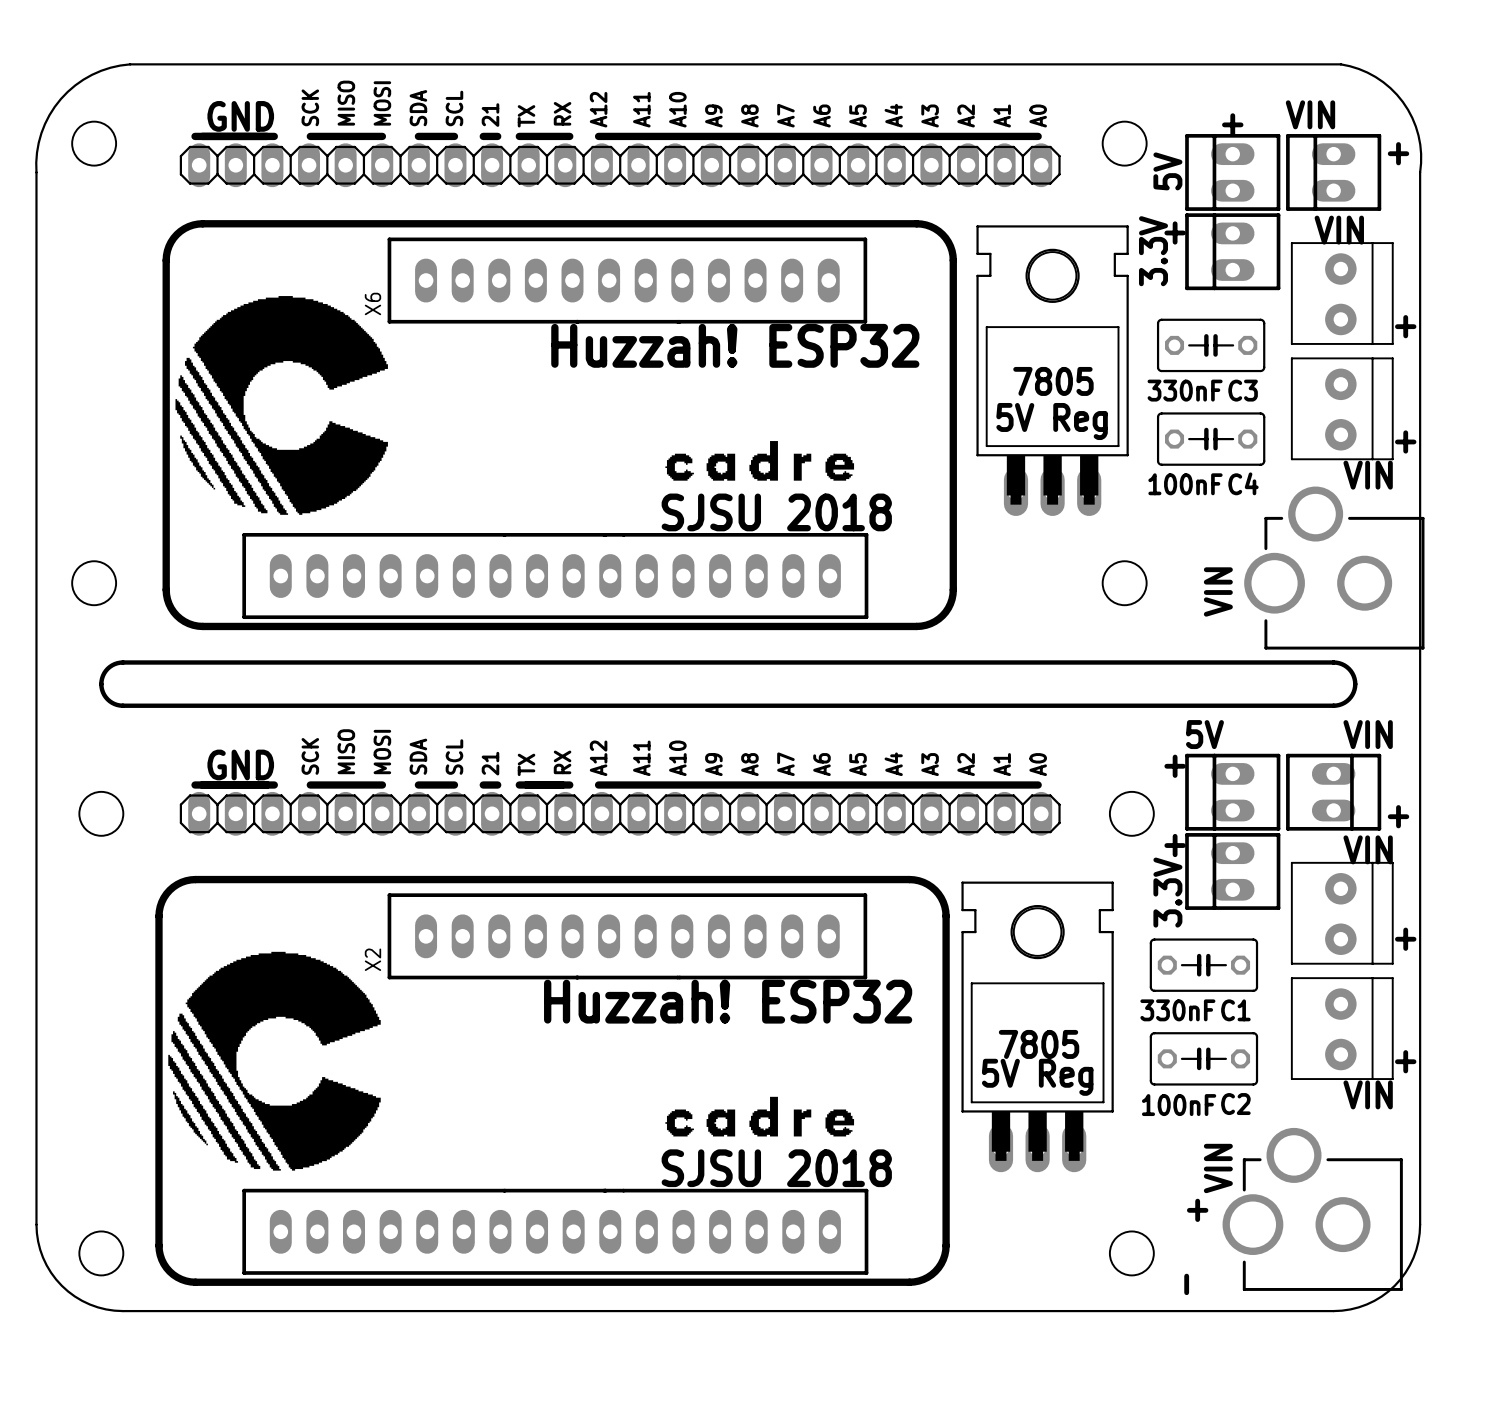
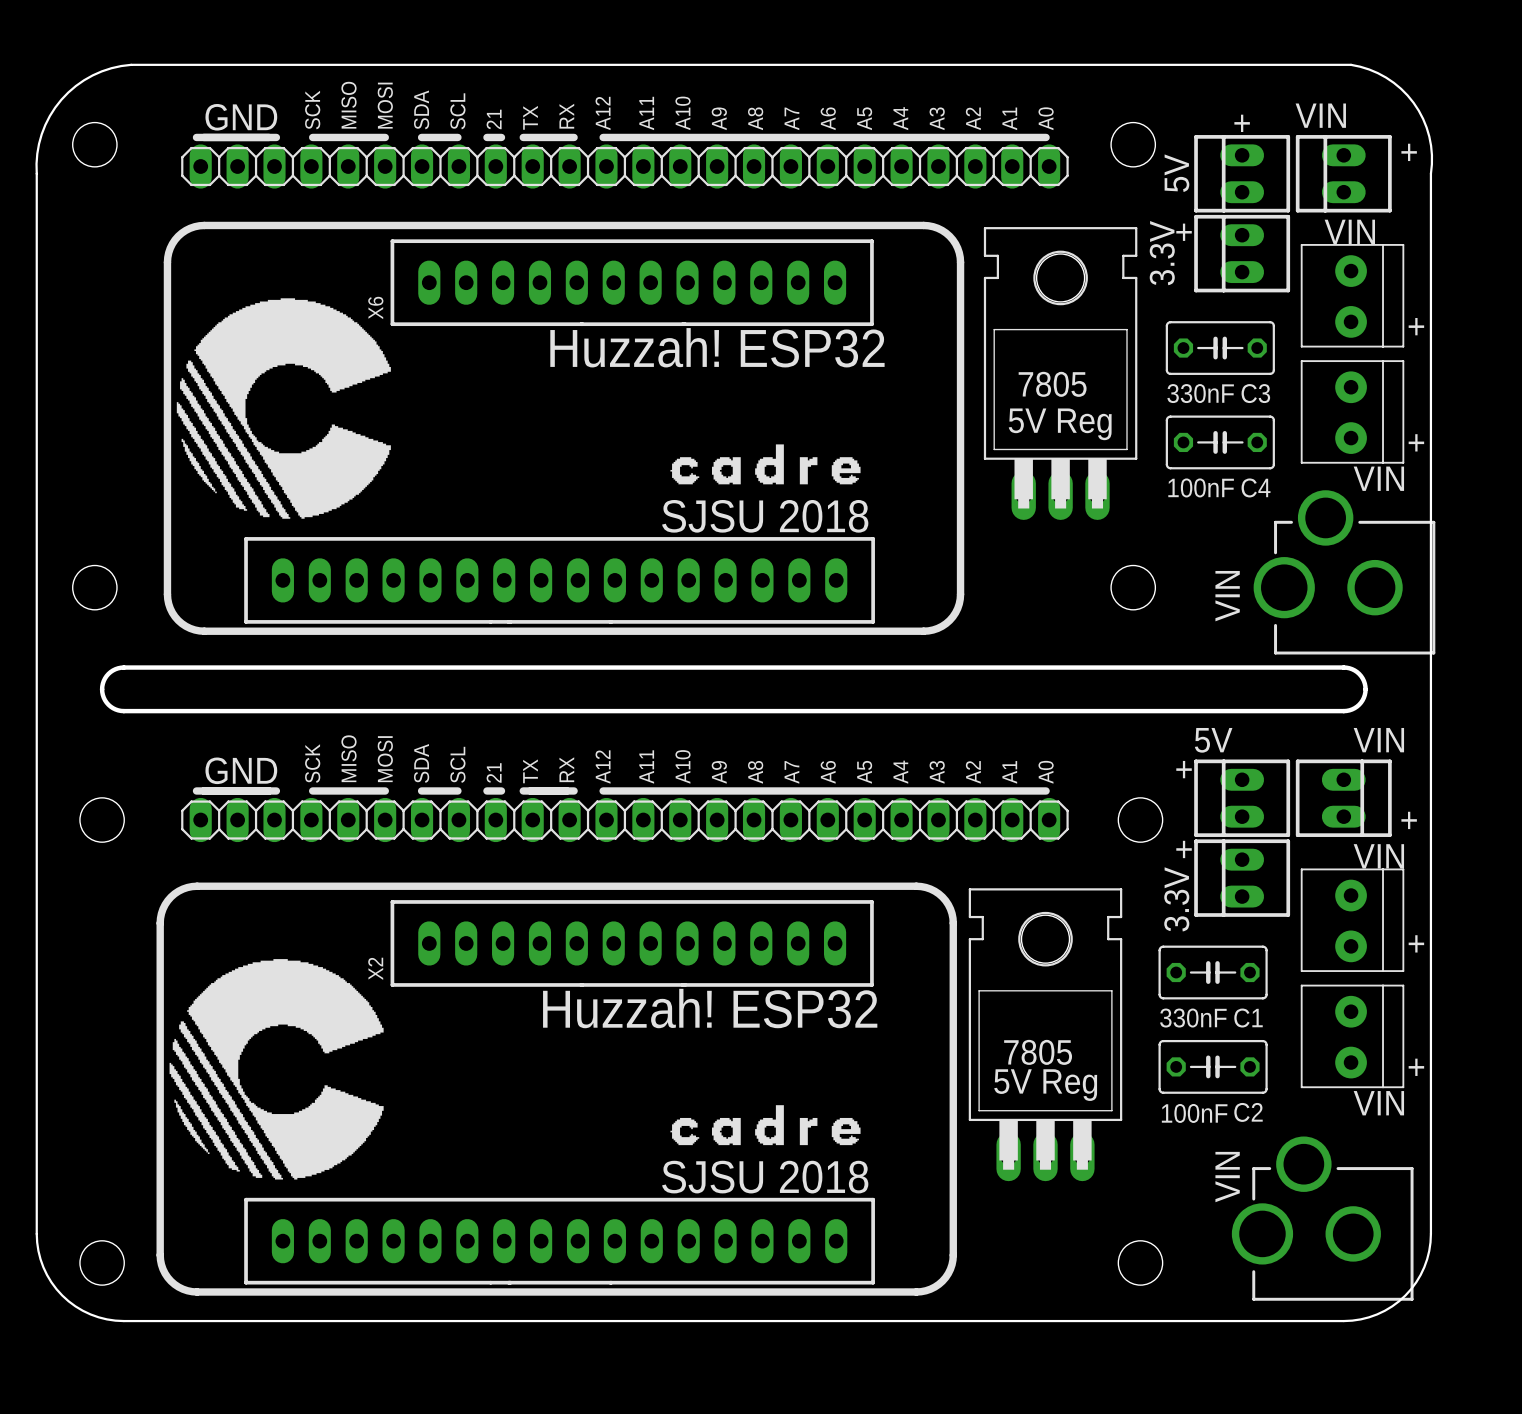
part rotation: 0° (555, 576) -> 180° (559, 580)
text: + (1197, 1210) -> none
part rotation: 0° (555, 1231) -> 180° (559, 1241)
text: - (1186, 1284) -> none

